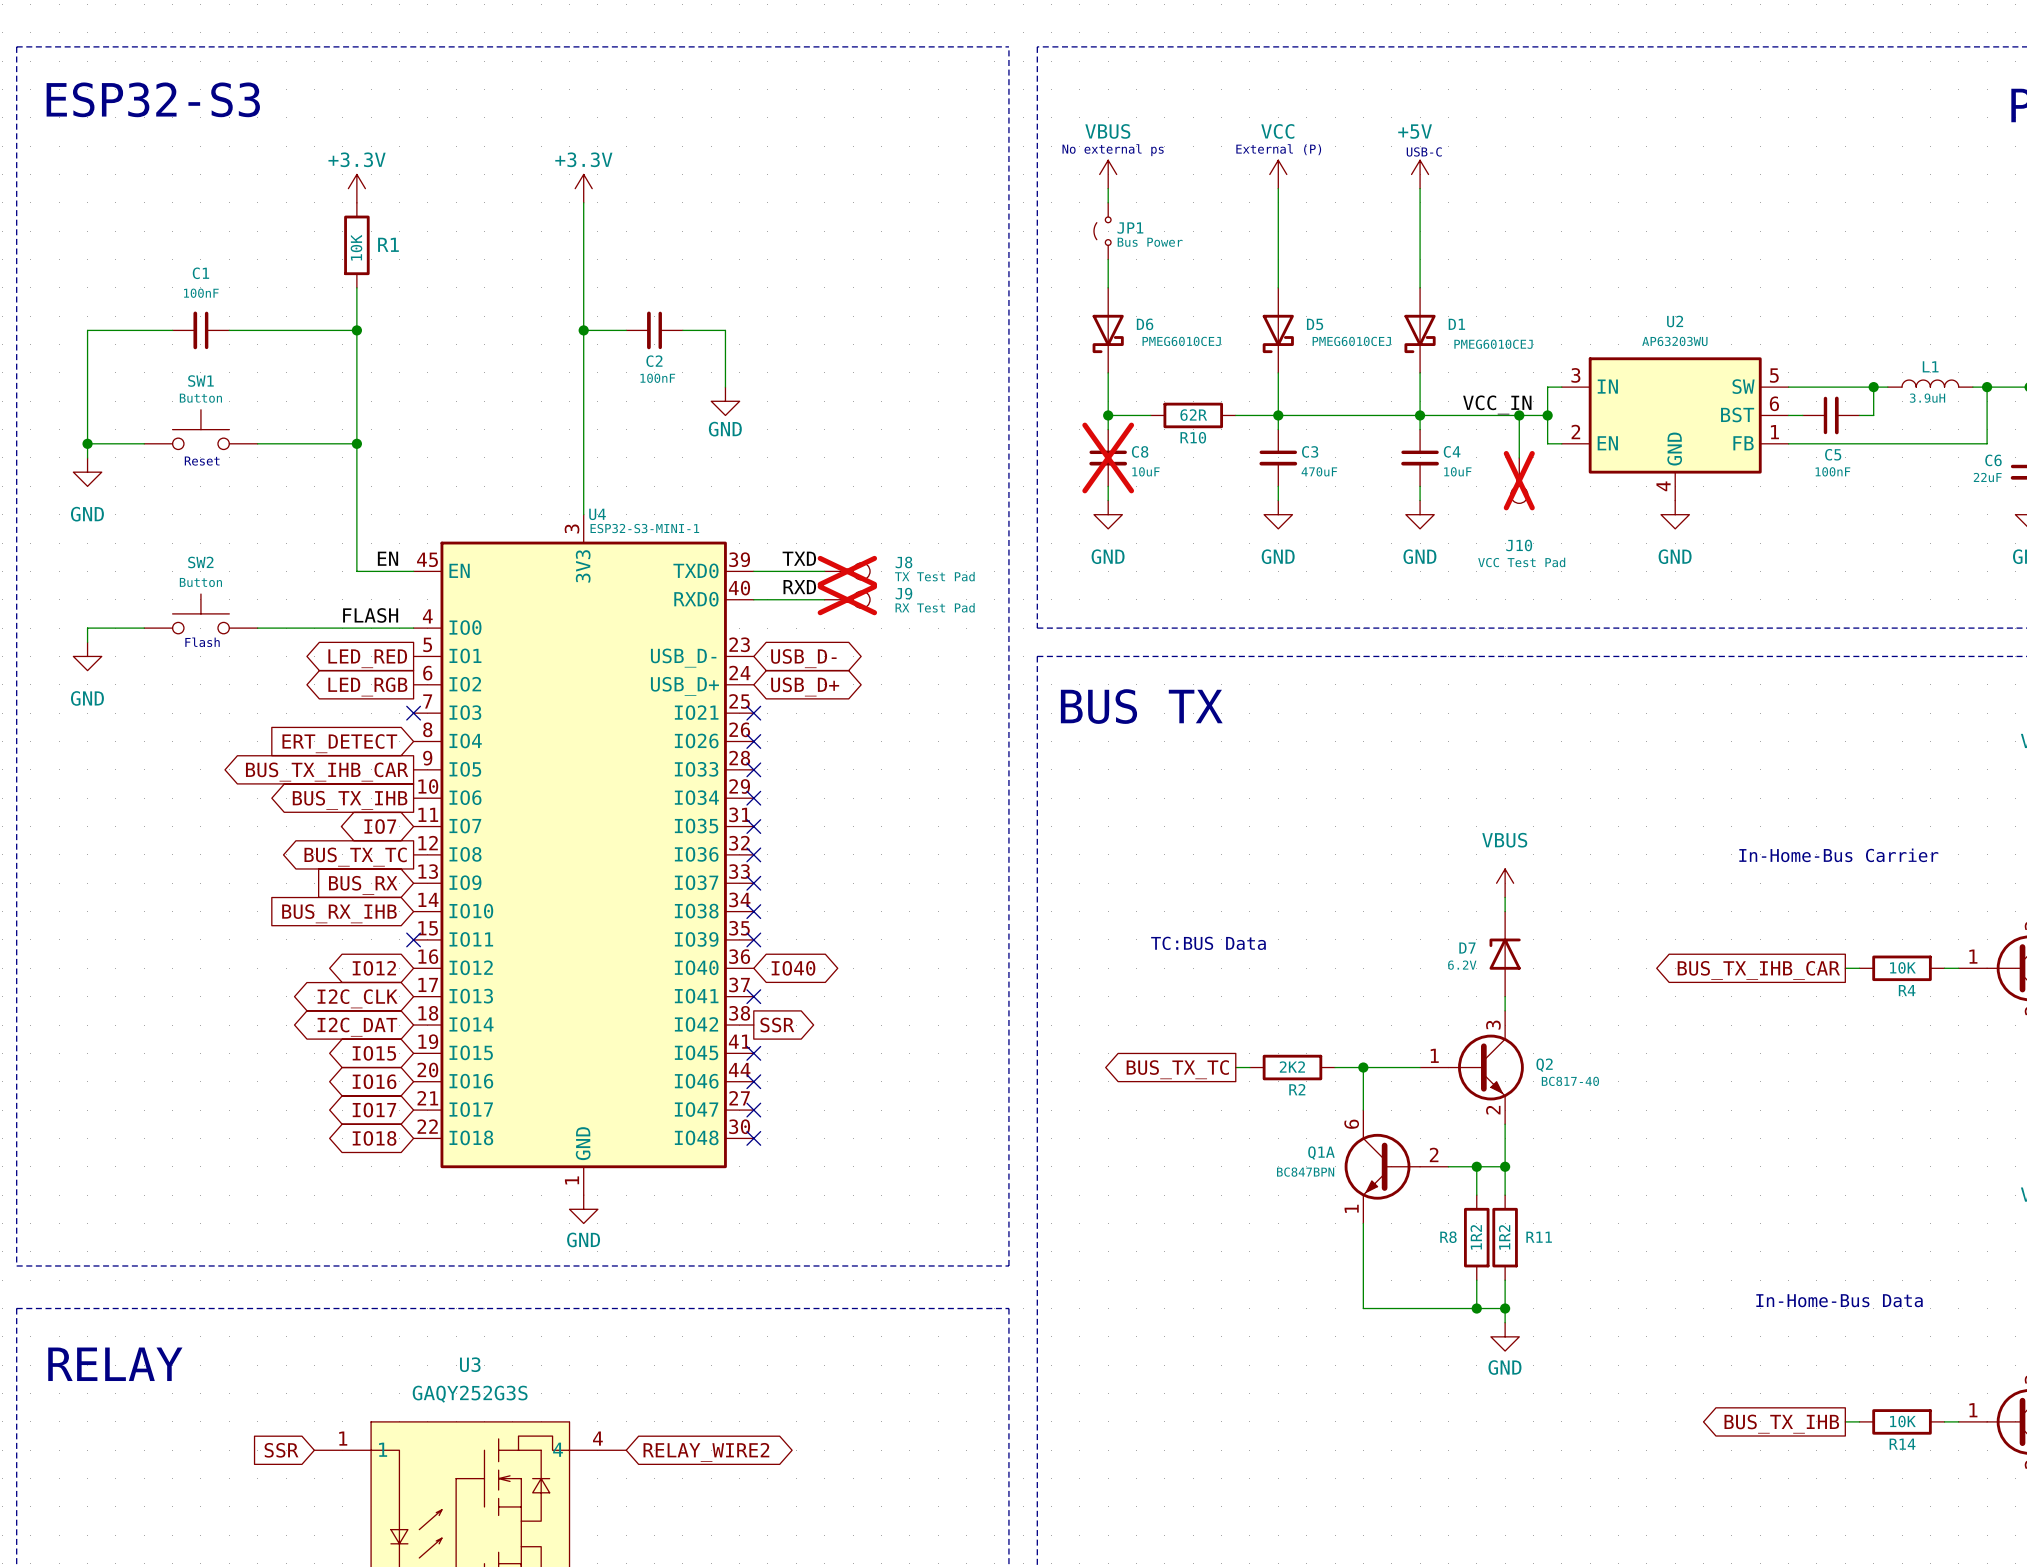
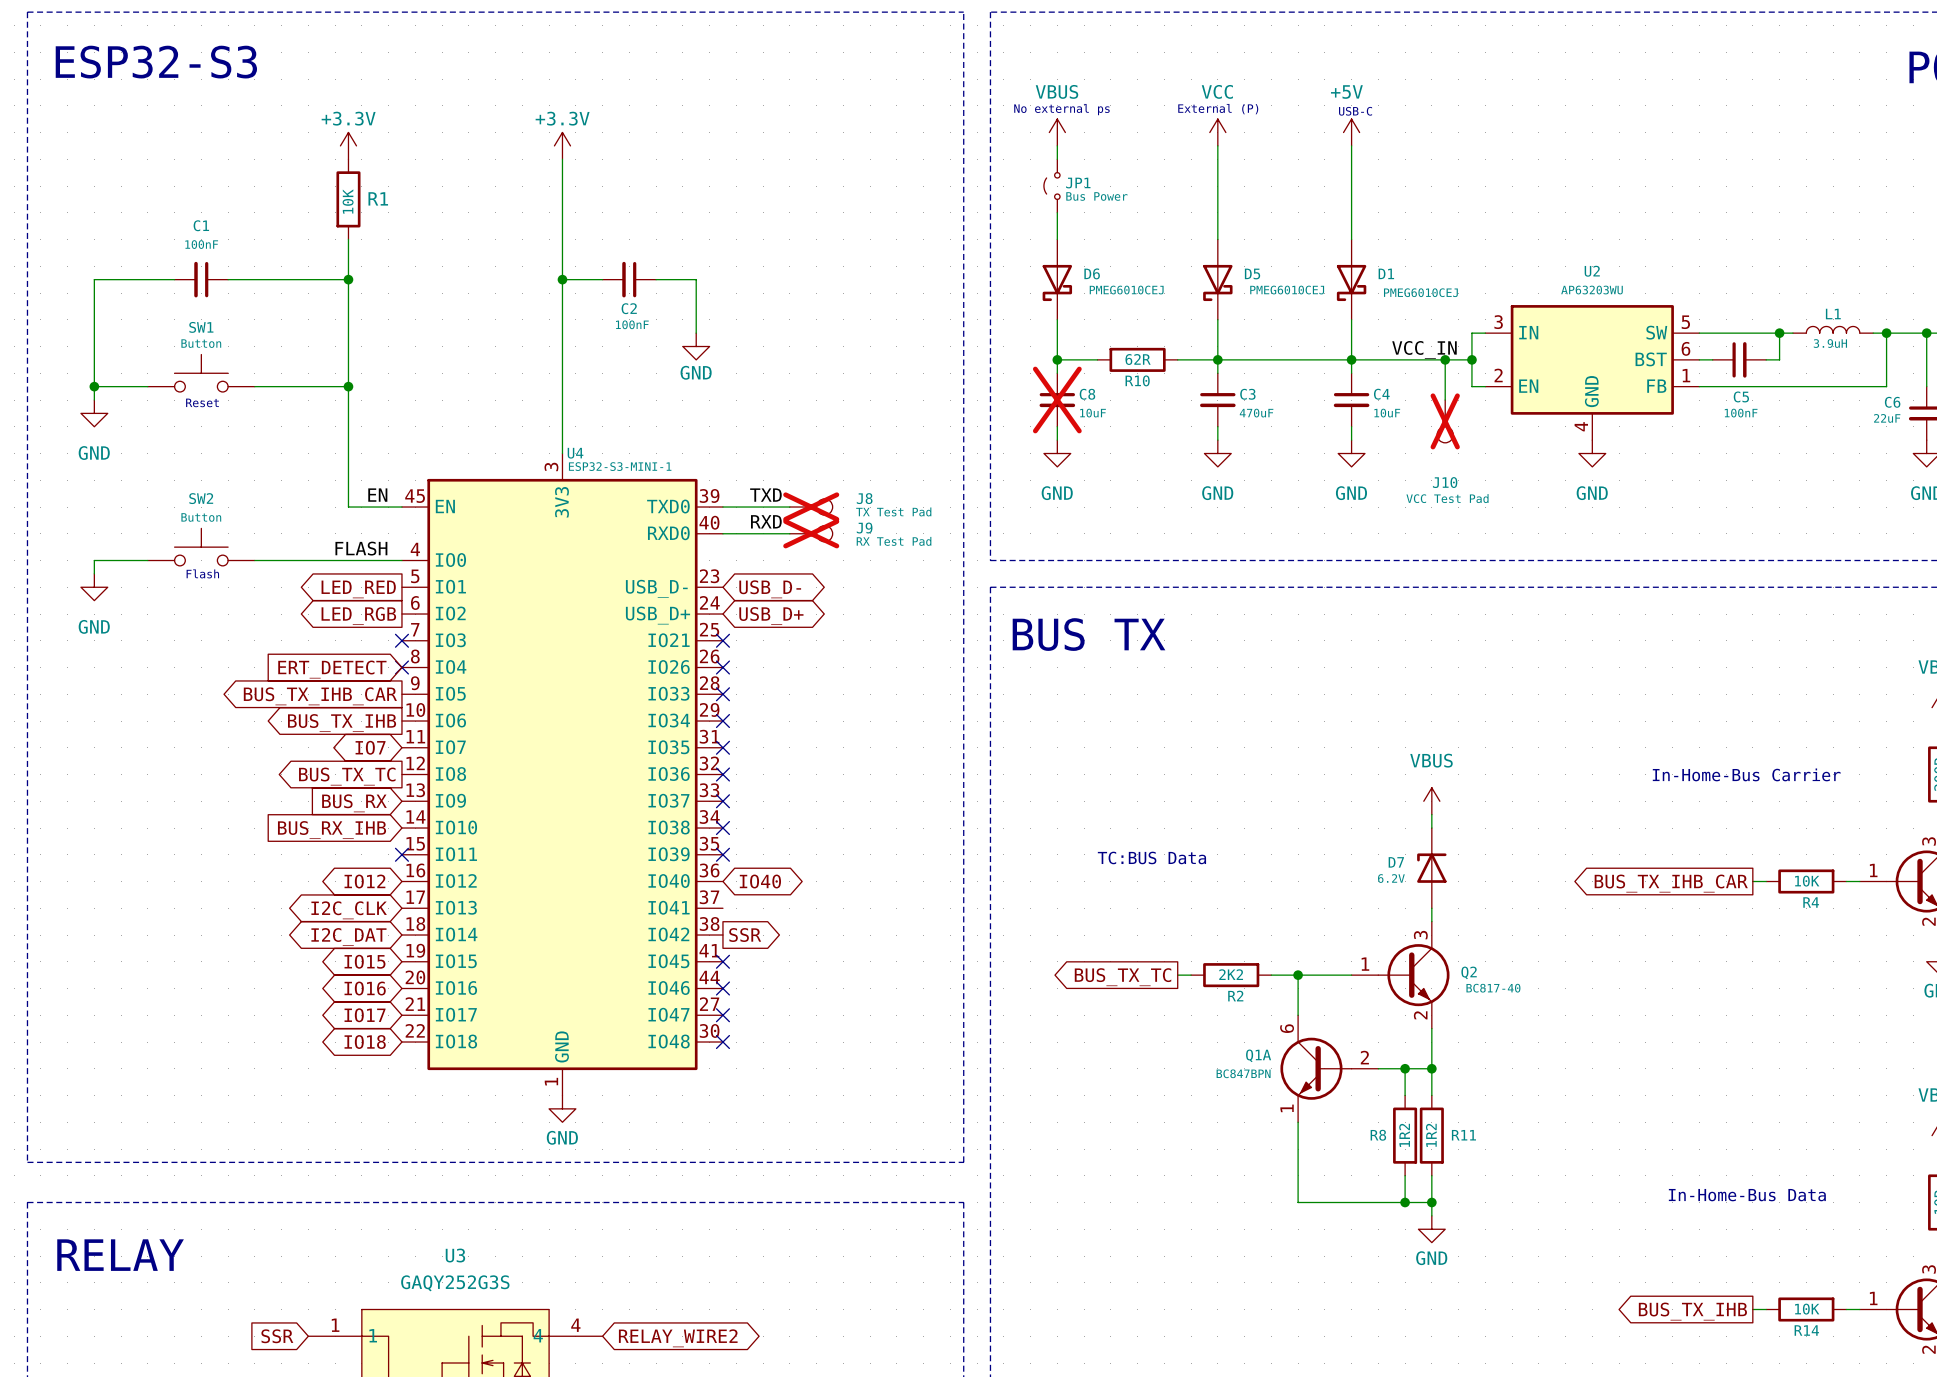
no-connect mark: none -> (401, 667)
no-connect mark: (753, 996) -> none

